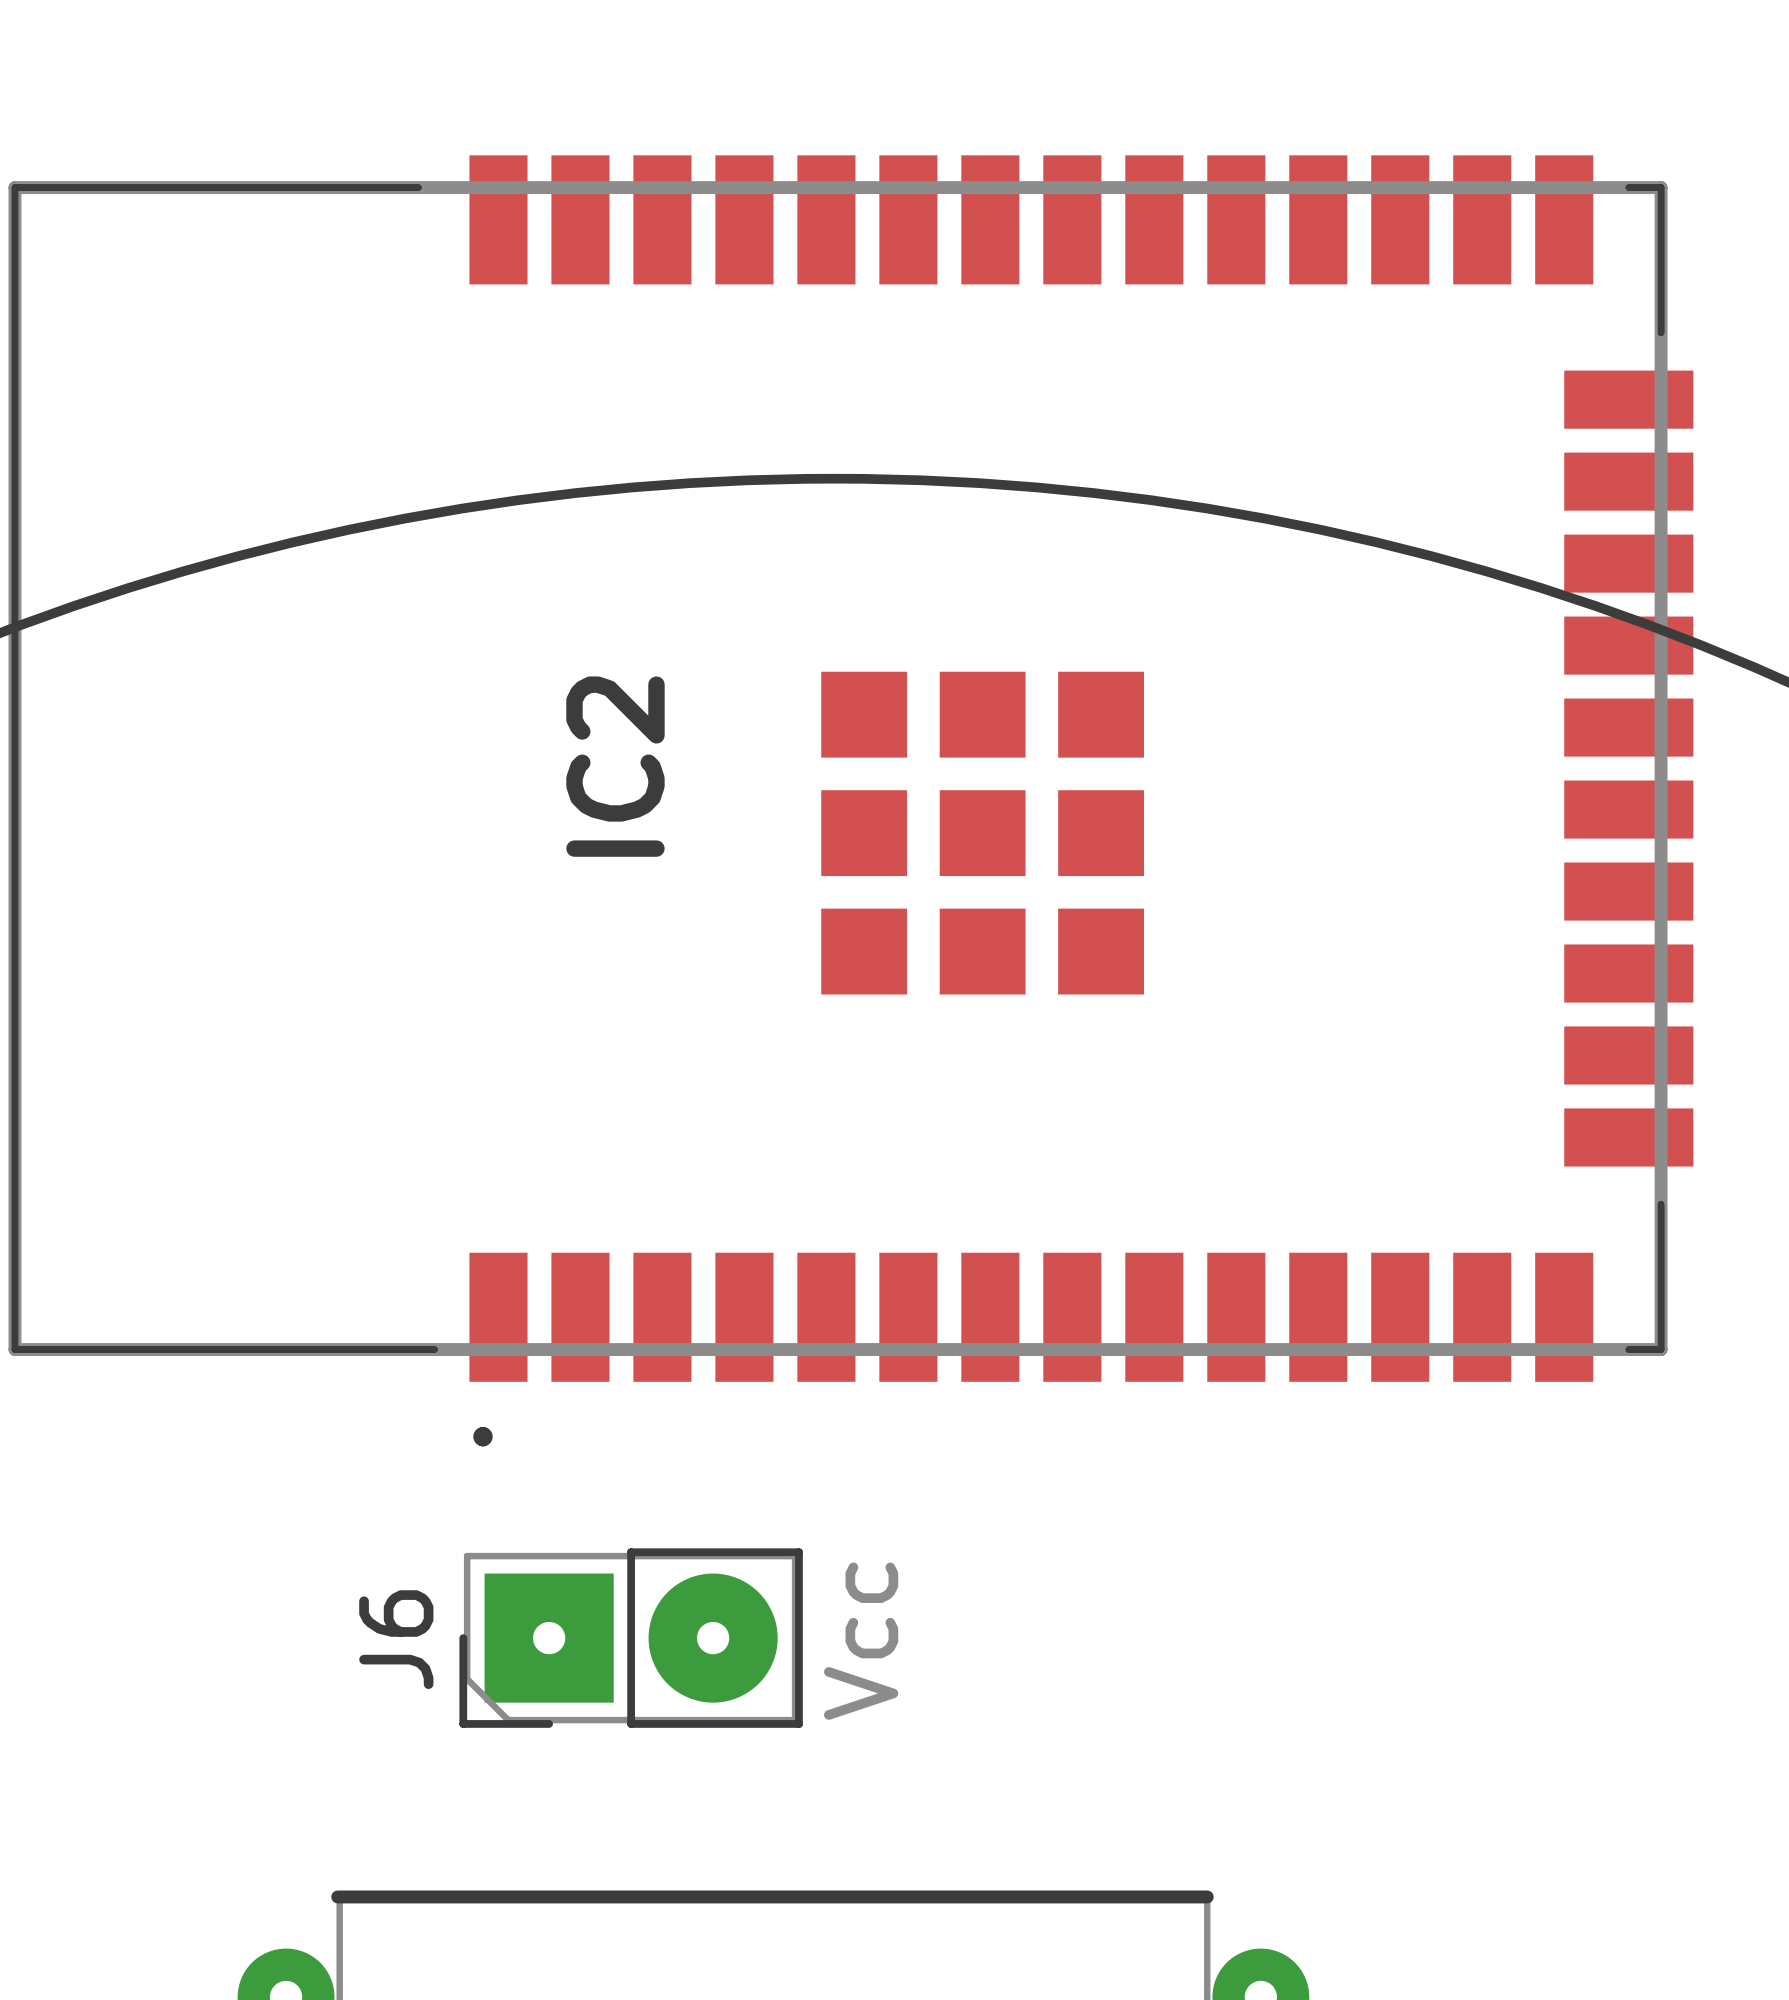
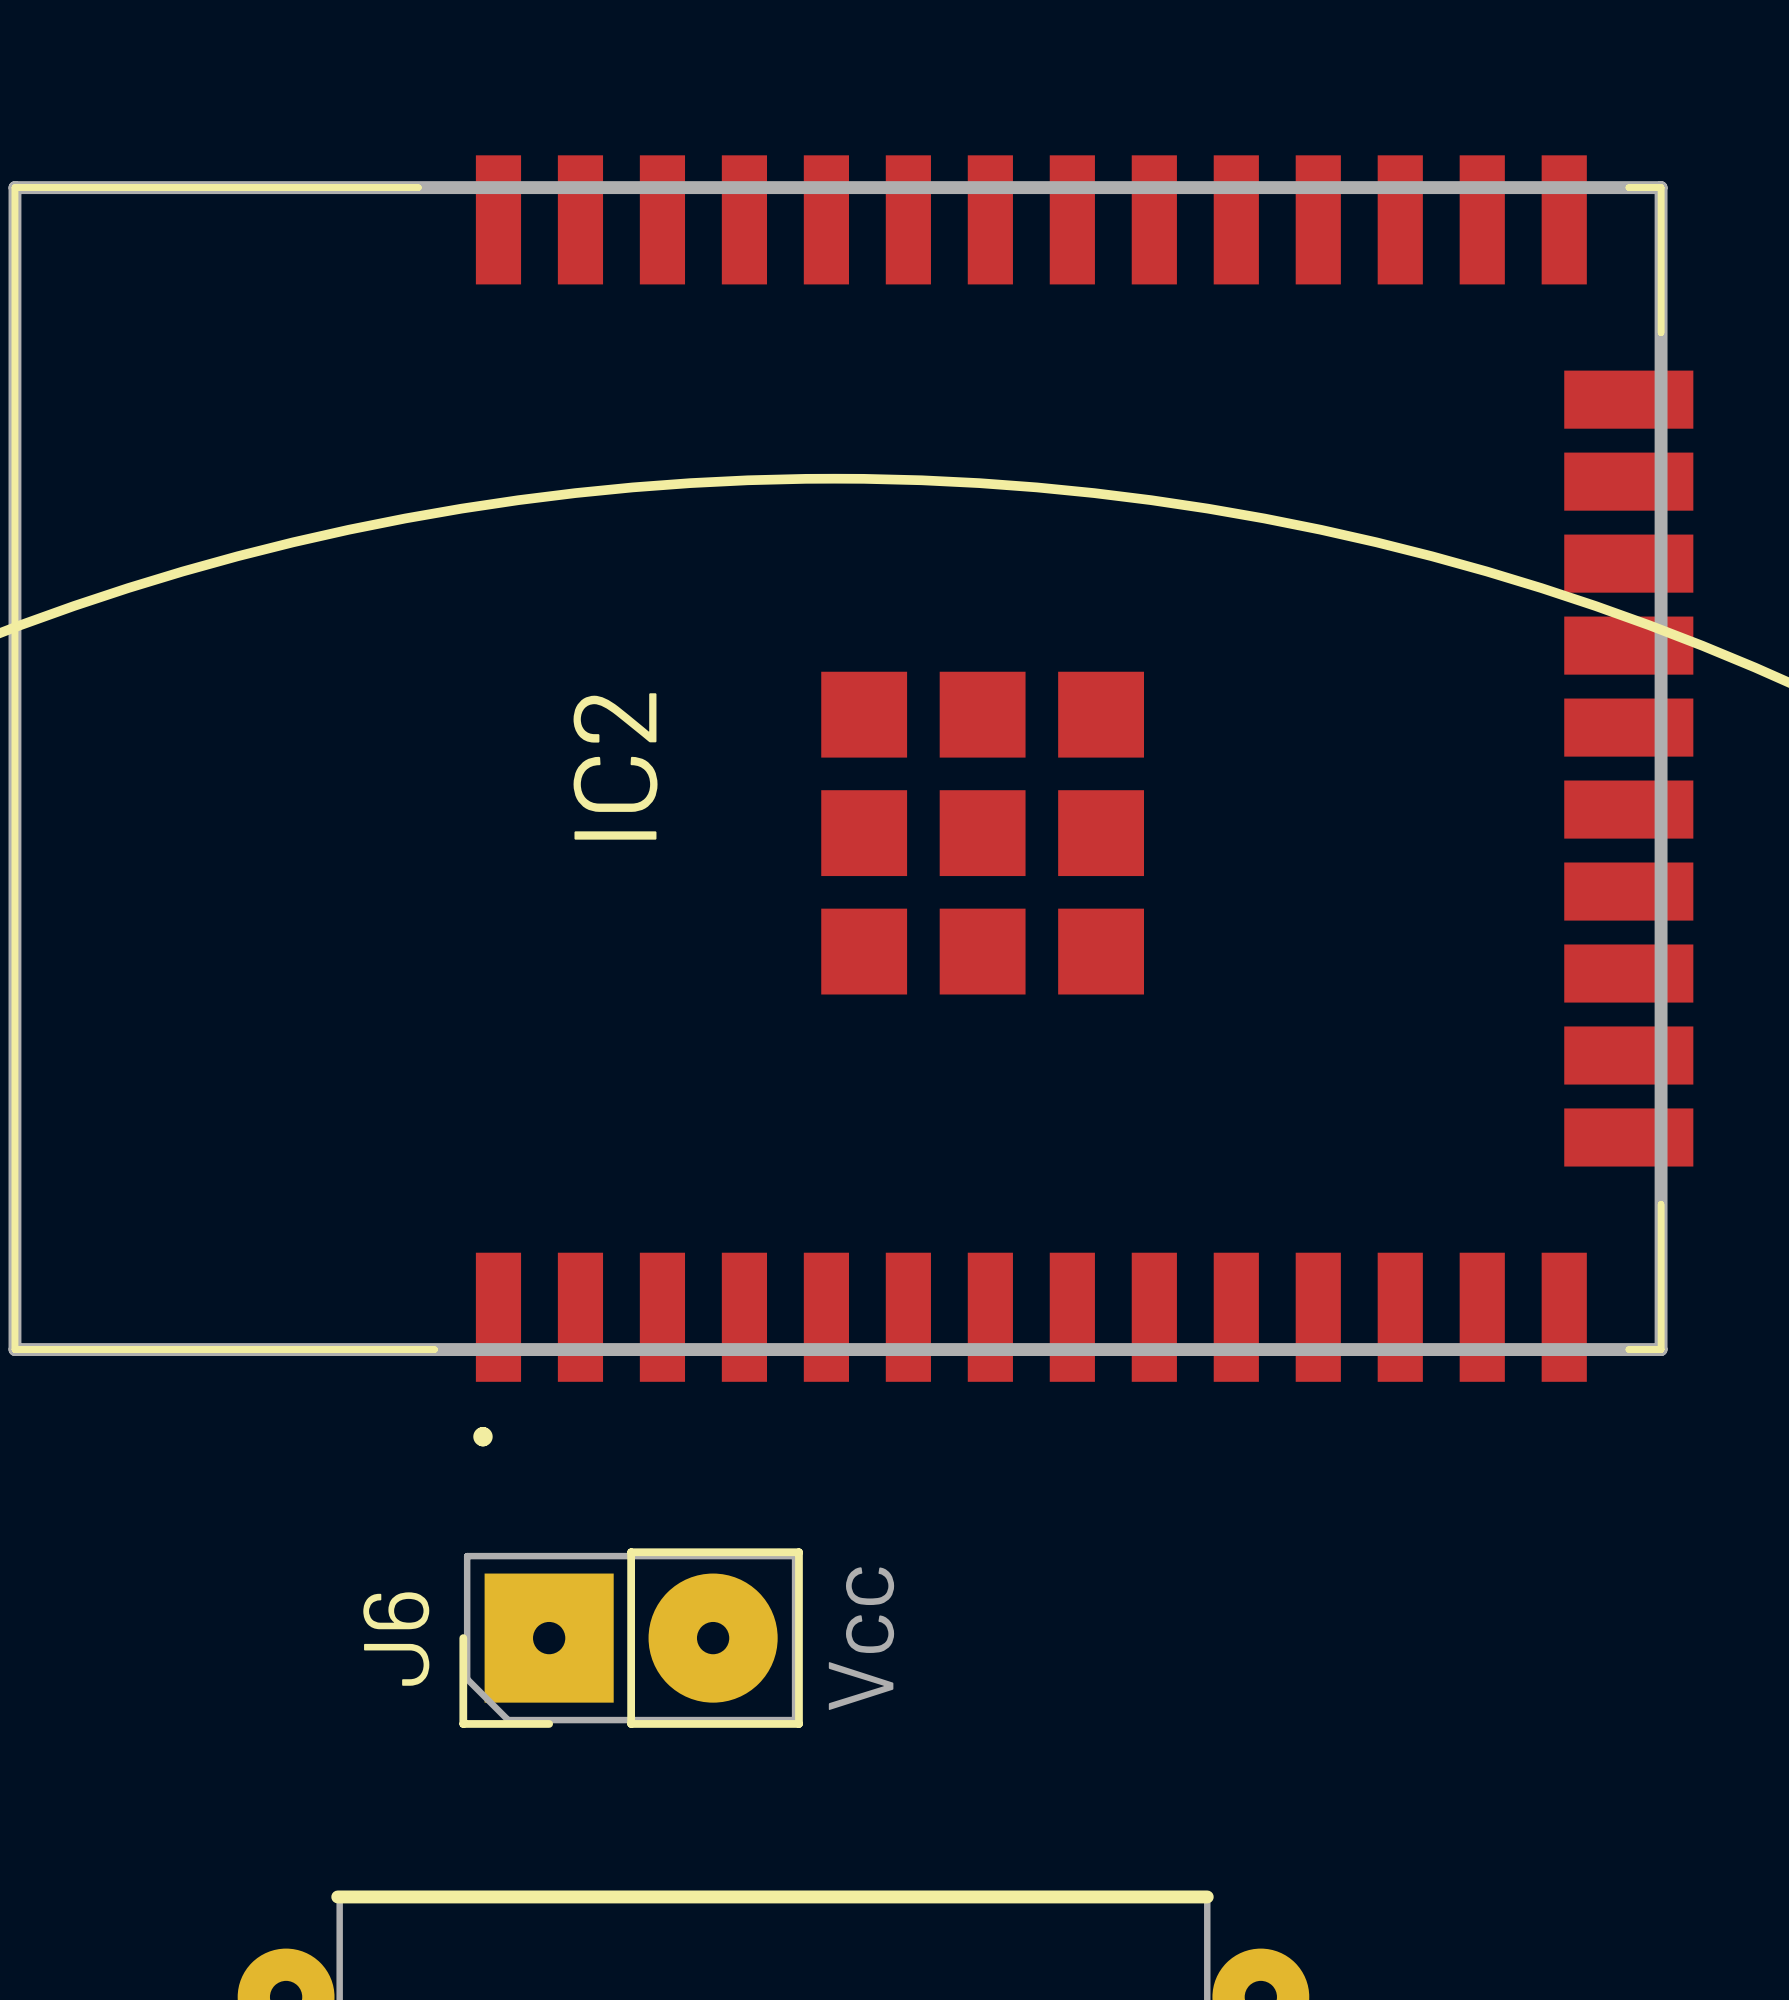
IC2 footprint: [8, 155, 1694, 1447] -> [8, 155, 1694, 1447]

